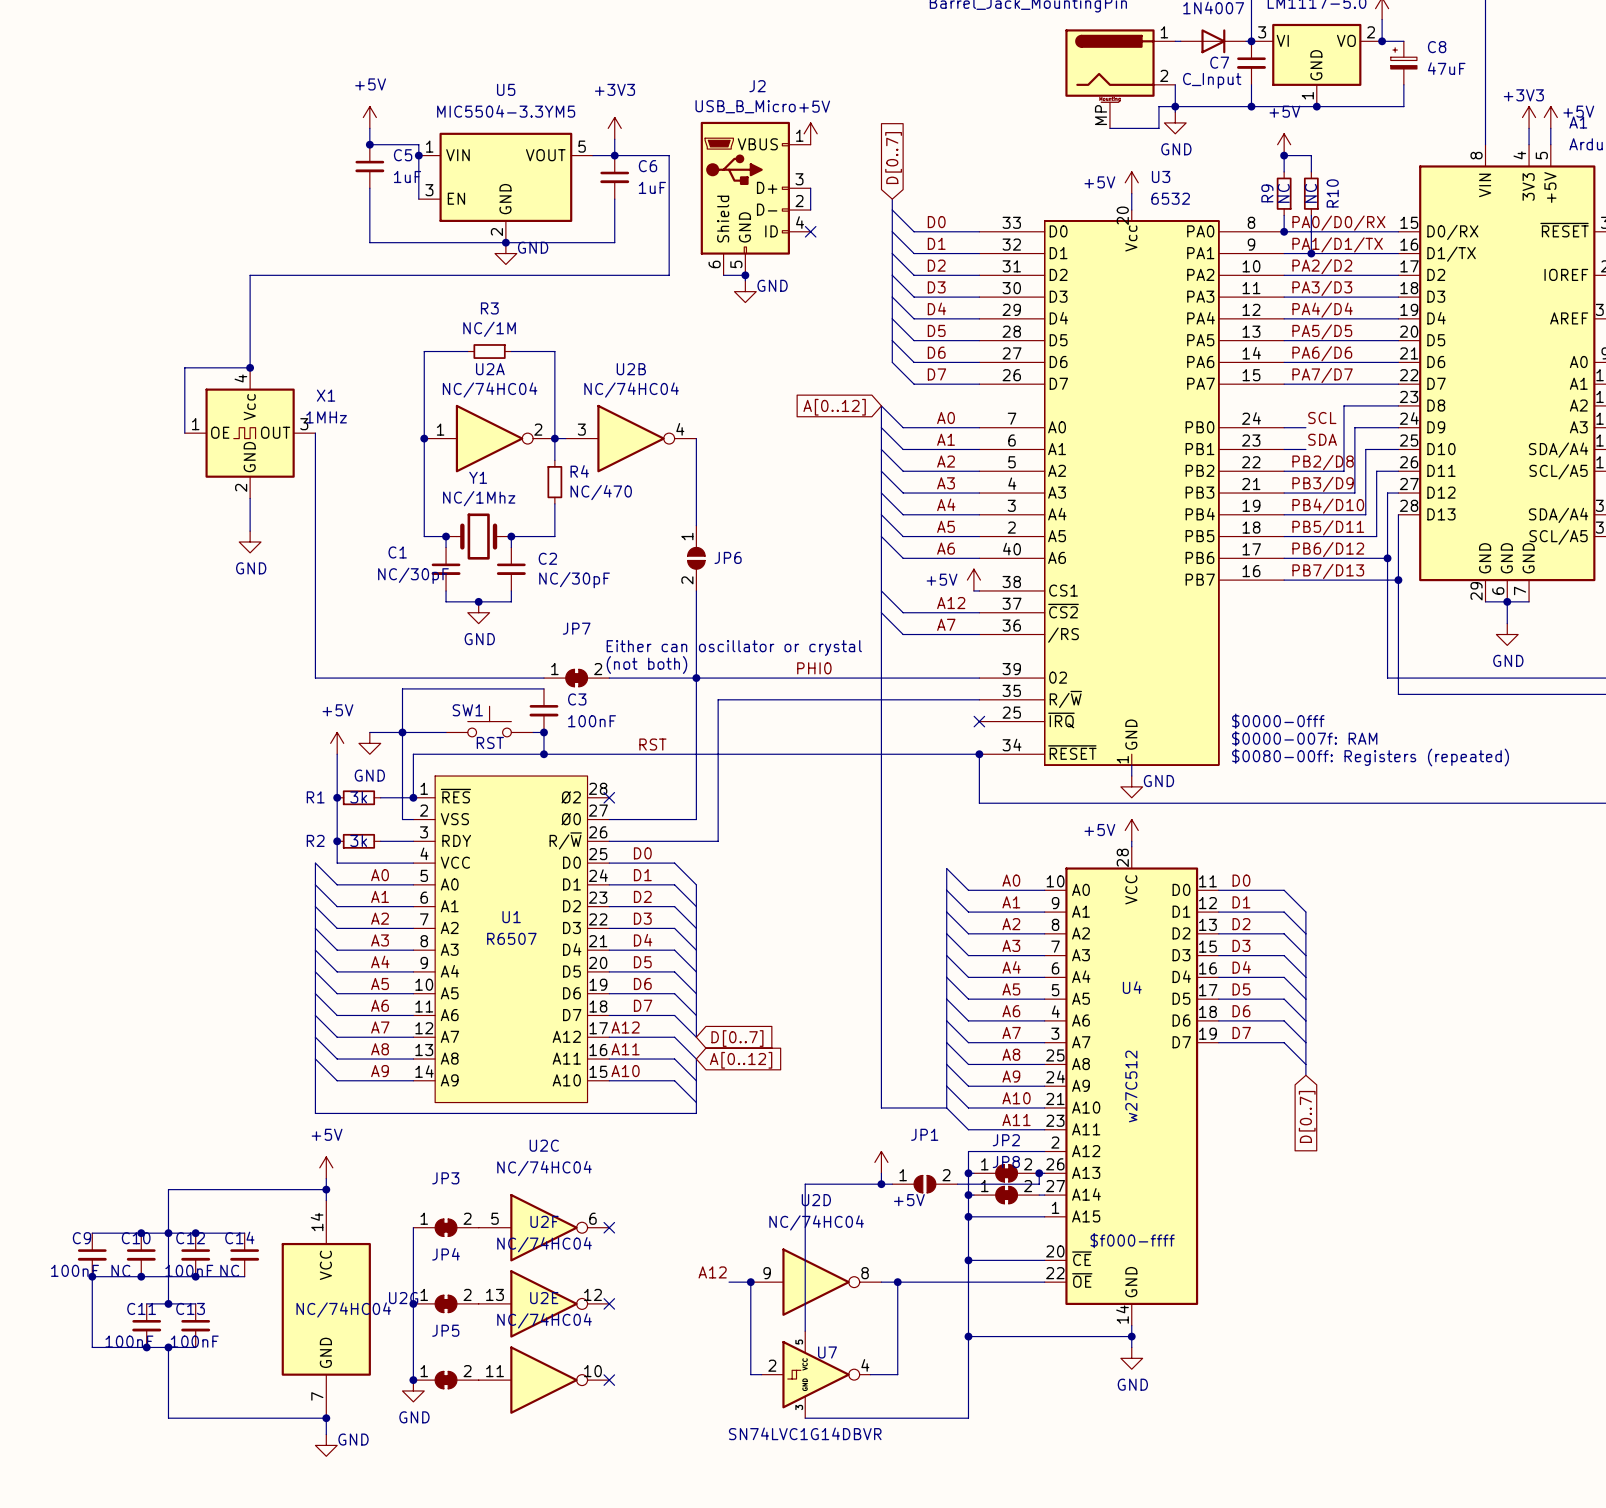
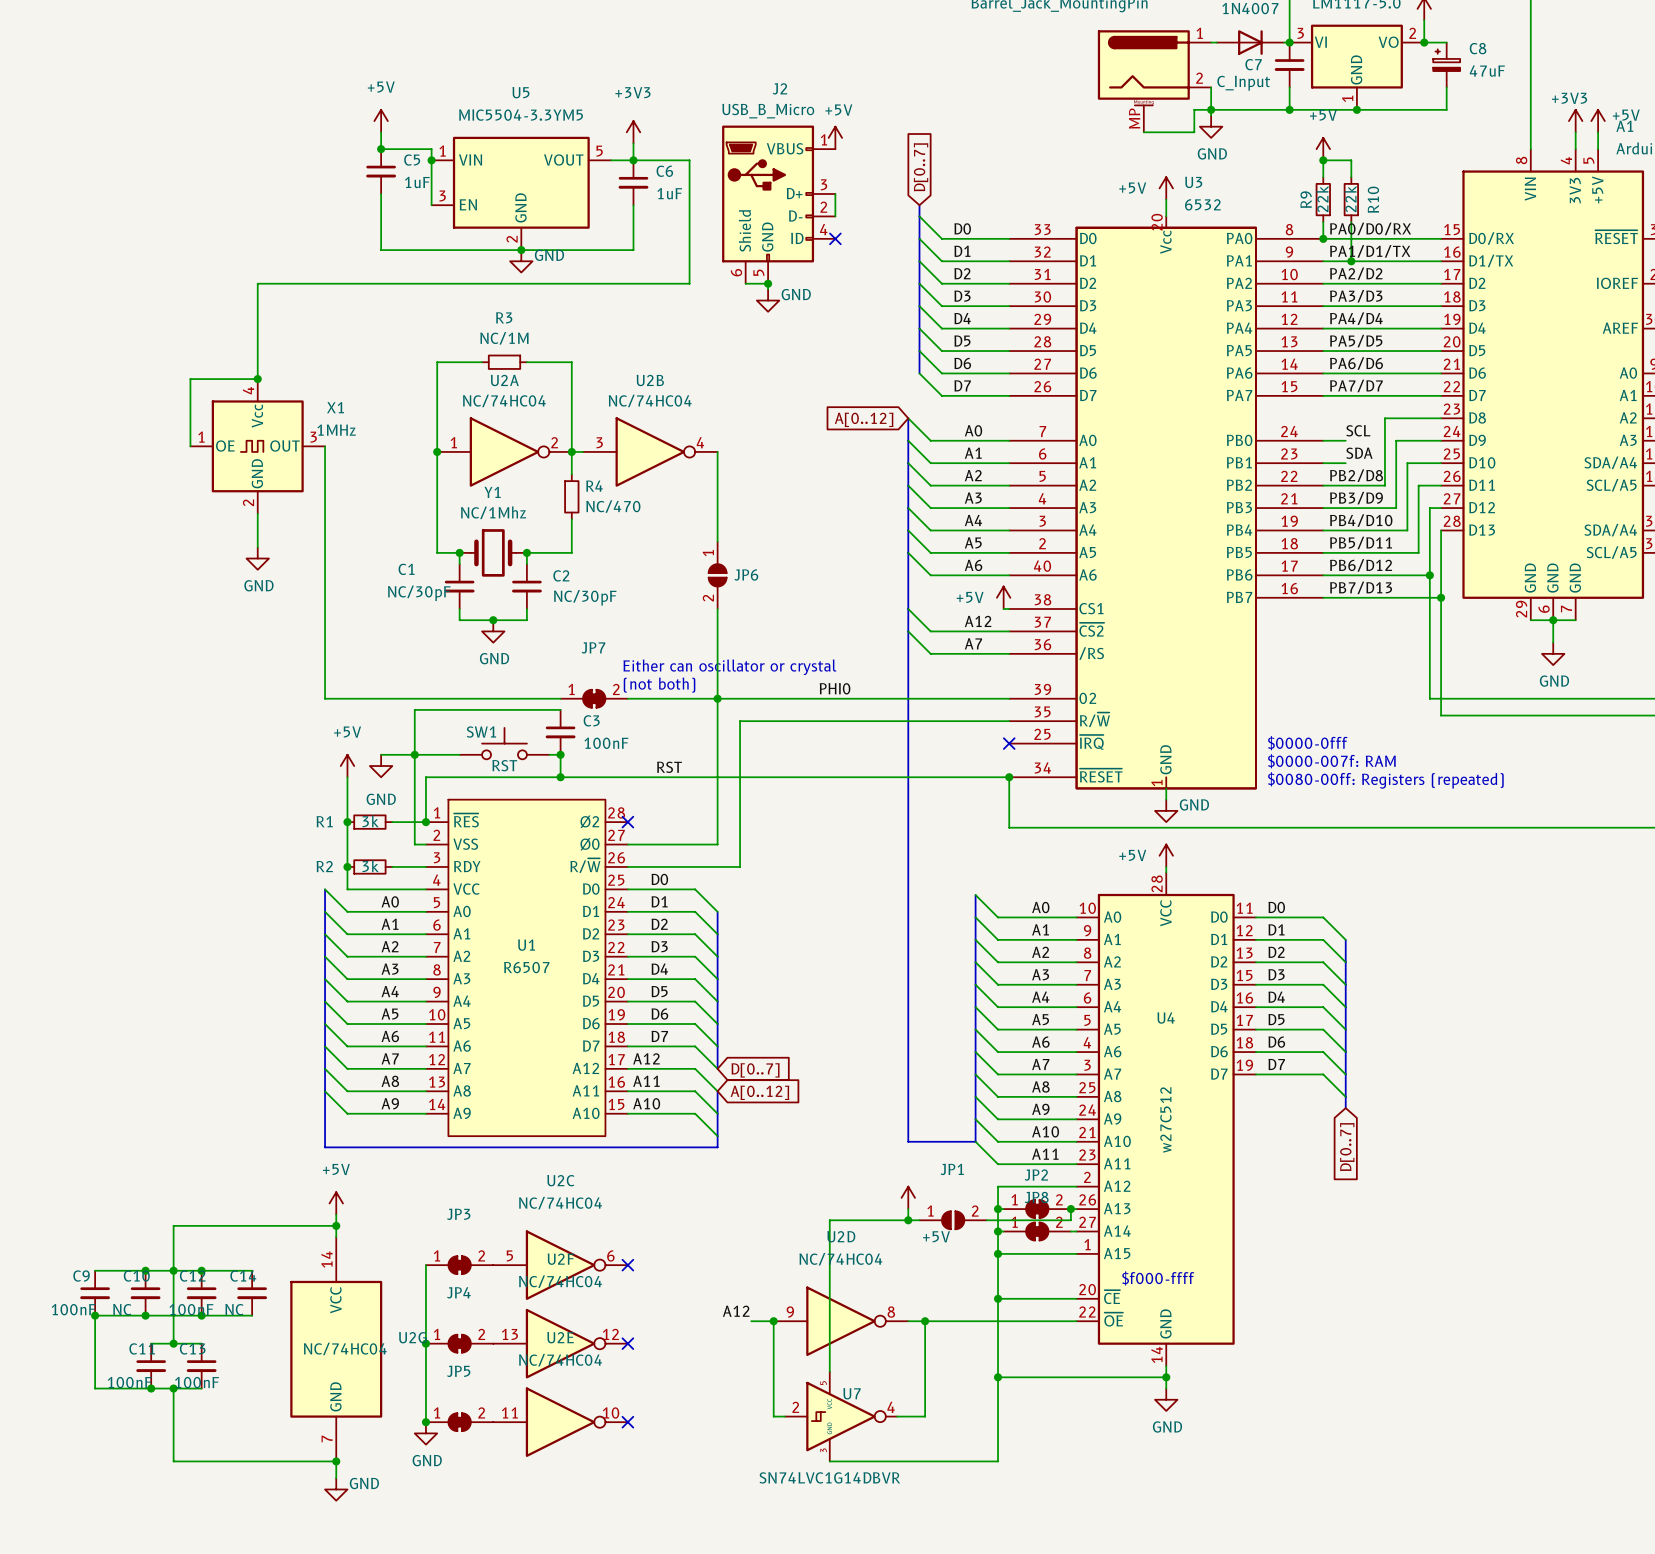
R9 value: NC (1283, 193) -> 22k (1322, 199)
R10 value: NC (1310, 193) -> 22k (1350, 199)

